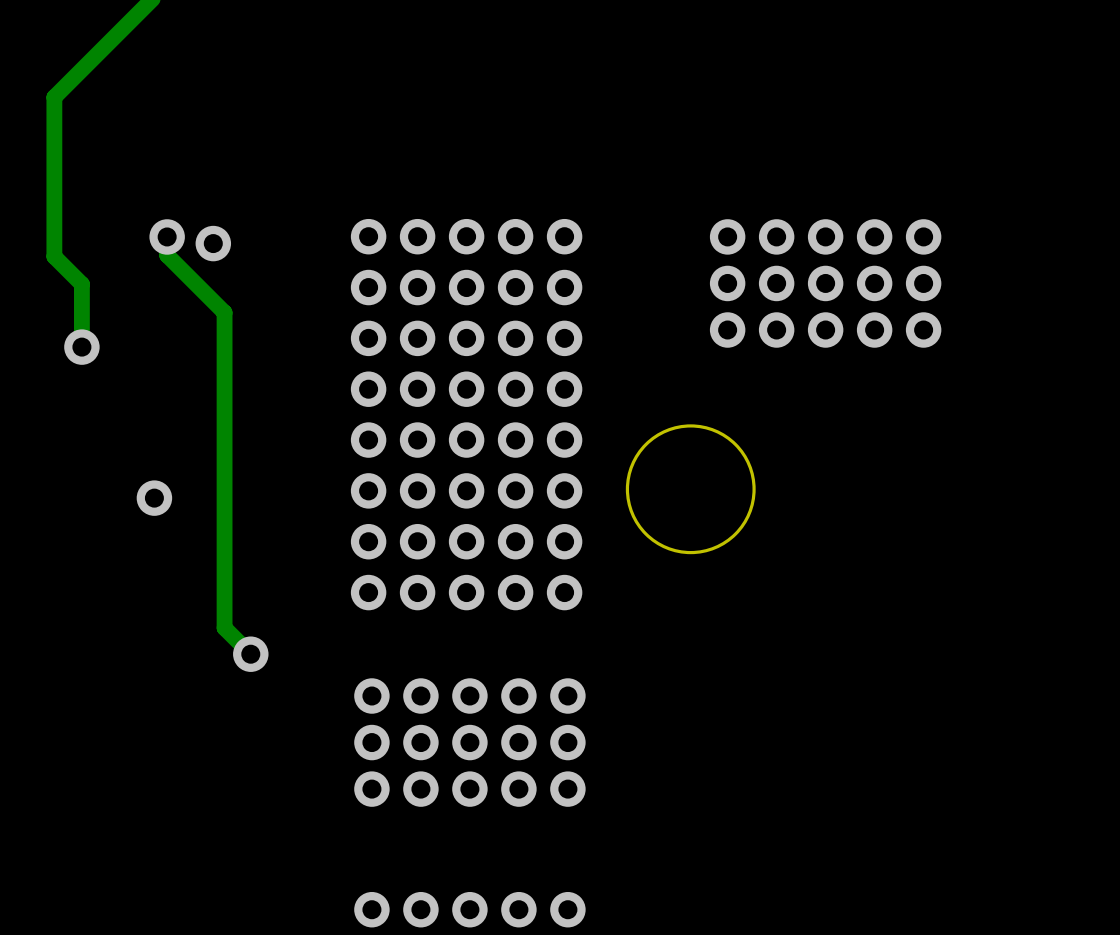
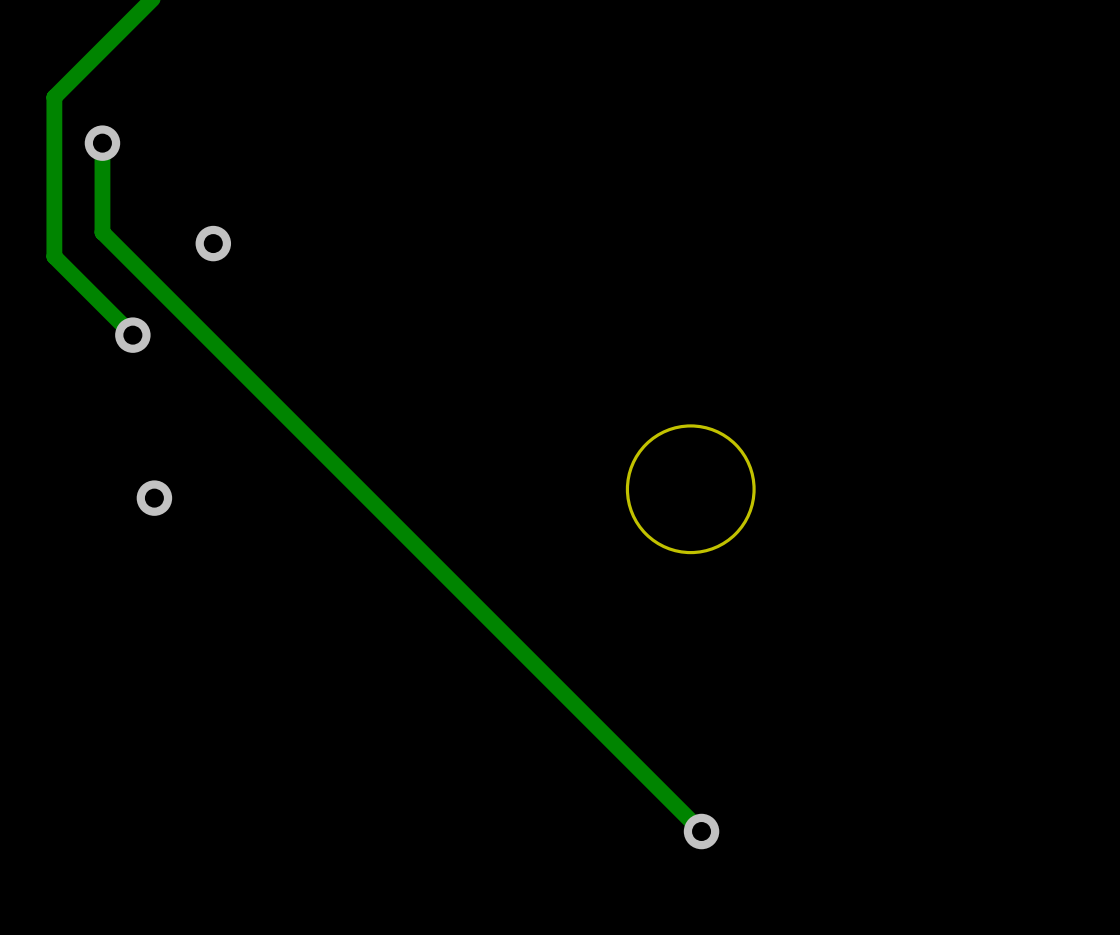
track: none -> (102, 143) (102, 232) (701, 831)
via: none -> (102, 143)
track: (167, 236) (167, 255) (224, 312) (224, 627) (250, 654) -> none
via: (167, 236) -> none
via: (368, 236) -> none
via: (417, 236) -> none
via: (466, 236) -> none
via: (515, 236) -> none
via: (564, 236) -> none
via: (727, 236) -> none
via: (776, 236) -> none
via: (825, 236) -> none
via: (874, 236) -> none
via: (923, 236) -> none
via: (727, 283) -> none
via: (776, 283) -> none
via: (825, 283) -> none
via: (874, 283) -> none
via: (923, 283) -> none
track: (81, 284) (81, 347) -> (81, 284) (132, 335)
via: (368, 287) -> none
via: (417, 287) -> none
via: (466, 287) -> none
via: (515, 287) -> none
via: (564, 287) -> none
via: (727, 330) -> none
via: (776, 330) -> none
via: (825, 330) -> none
via: (874, 330) -> none
via: (923, 330) -> none
via: none -> (132, 335)
via: (368, 338) -> none
via: (417, 338) -> none
via: (466, 338) -> none
via: (515, 338) -> none
via: (564, 338) -> none
via: (81, 347) -> none
via: (368, 389) -> none
via: (417, 389) -> none
via: (466, 389) -> none
via: (515, 389) -> none
via: (564, 389) -> none
via: (368, 440) -> none
via: (417, 440) -> none
via: (466, 440) -> none
via: (515, 440) -> none
via: (564, 440) -> none
via: (368, 490) -> none
via: (417, 490) -> none
via: (466, 490) -> none
via: (515, 490) -> none
via: (564, 490) -> none
via: (368, 541) -> none
via: (417, 541) -> none
via: (466, 541) -> none
via: (515, 541) -> none
via: (564, 541) -> none
via: (368, 592) -> none
via: (417, 592) -> none
via: (466, 592) -> none
via: (515, 592) -> none
via: (564, 592) -> none
via: (250, 654) -> none
via: (371, 696) -> none
via: (420, 696) -> none
via: (469, 696) -> none
via: (518, 696) -> none
via: (567, 696) -> none
via: (371, 742) -> none
via: (420, 742) -> none
via: (469, 742) -> none
via: (518, 742) -> none
via: (567, 742) -> none
via: (371, 789) -> none
via: (420, 789) -> none
via: (469, 789) -> none
via: (518, 789) -> none
via: (567, 789) -> none
via: none -> (701, 831)
via: (371, 909) -> none
via: (420, 909) -> none
via: (469, 909) -> none
via: (518, 909) -> none
via: (567, 909) -> none

